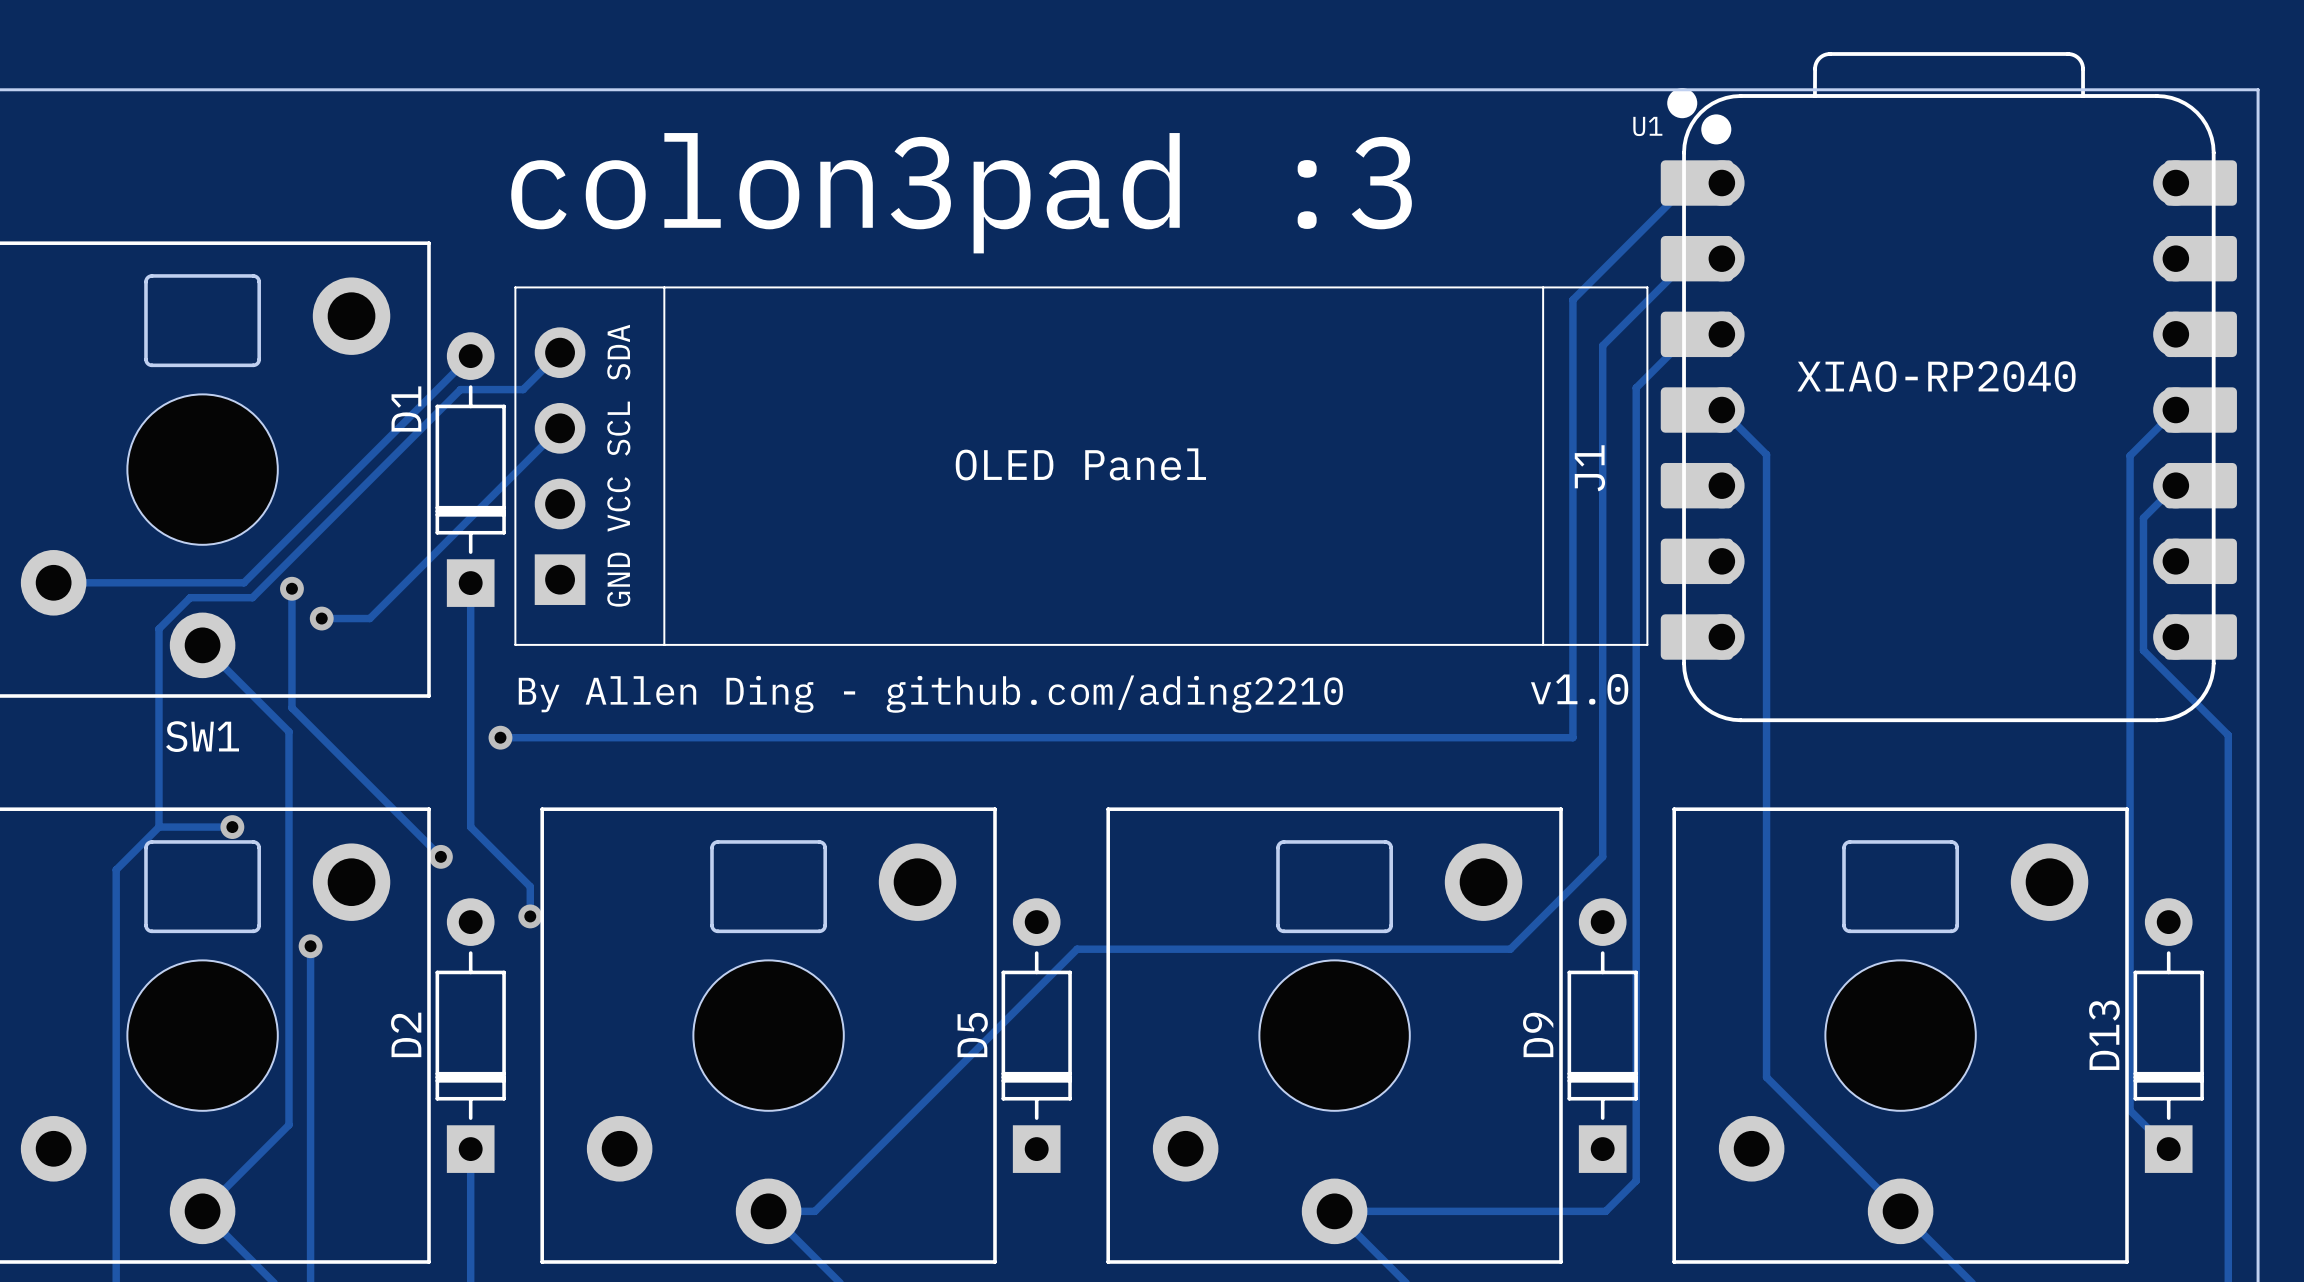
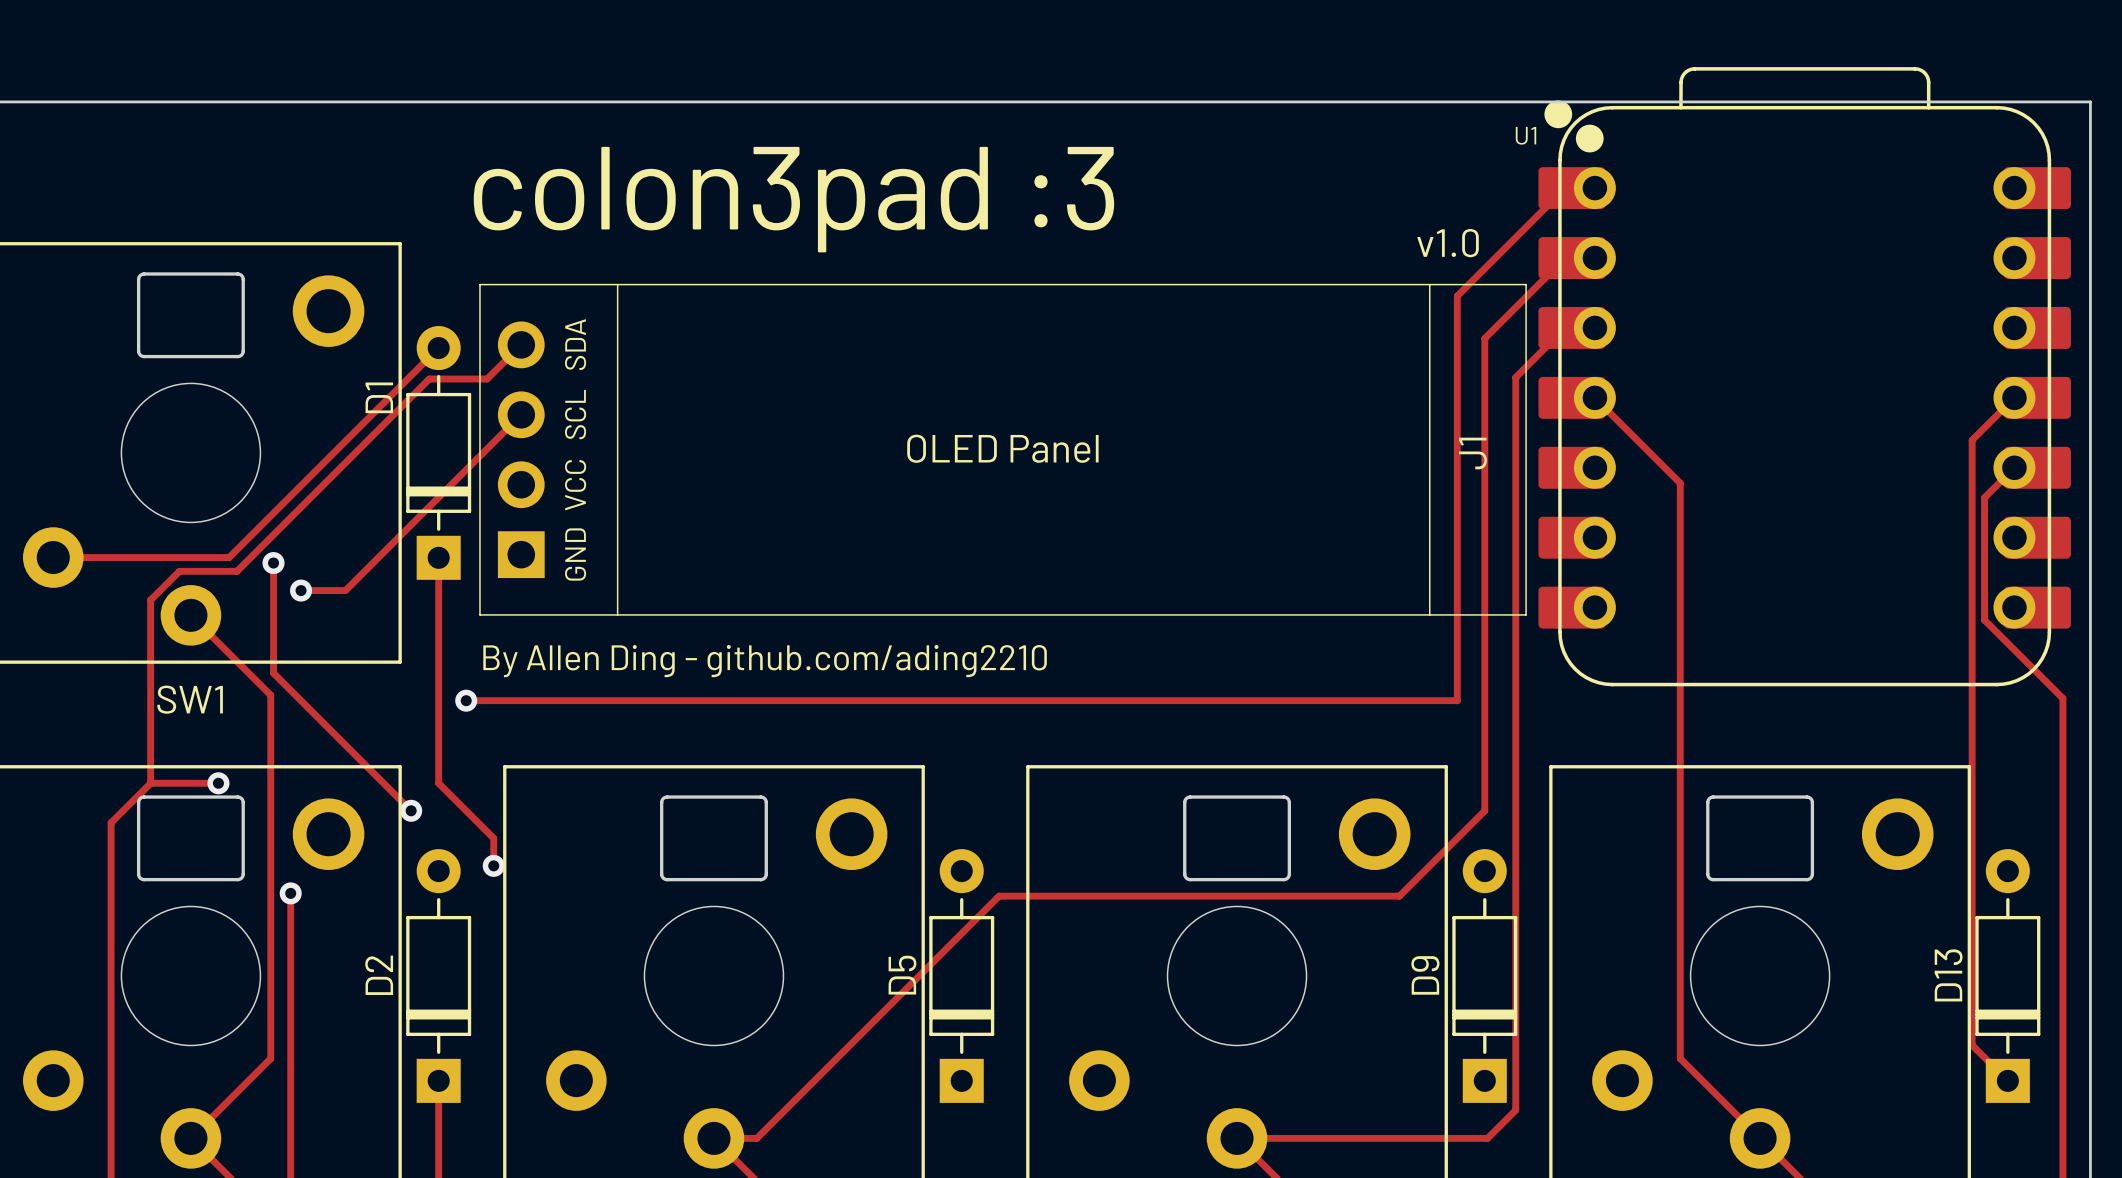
text: XIAO-RP2040 (1936, 376) -> none
track: (1766, 454) (1766, 1077) (1814, 1124) -> (1636, 439) (1680, 483) (1680, 1058)
text position: v1.0 (1579, 689) -> v1.0 (1448, 243)

